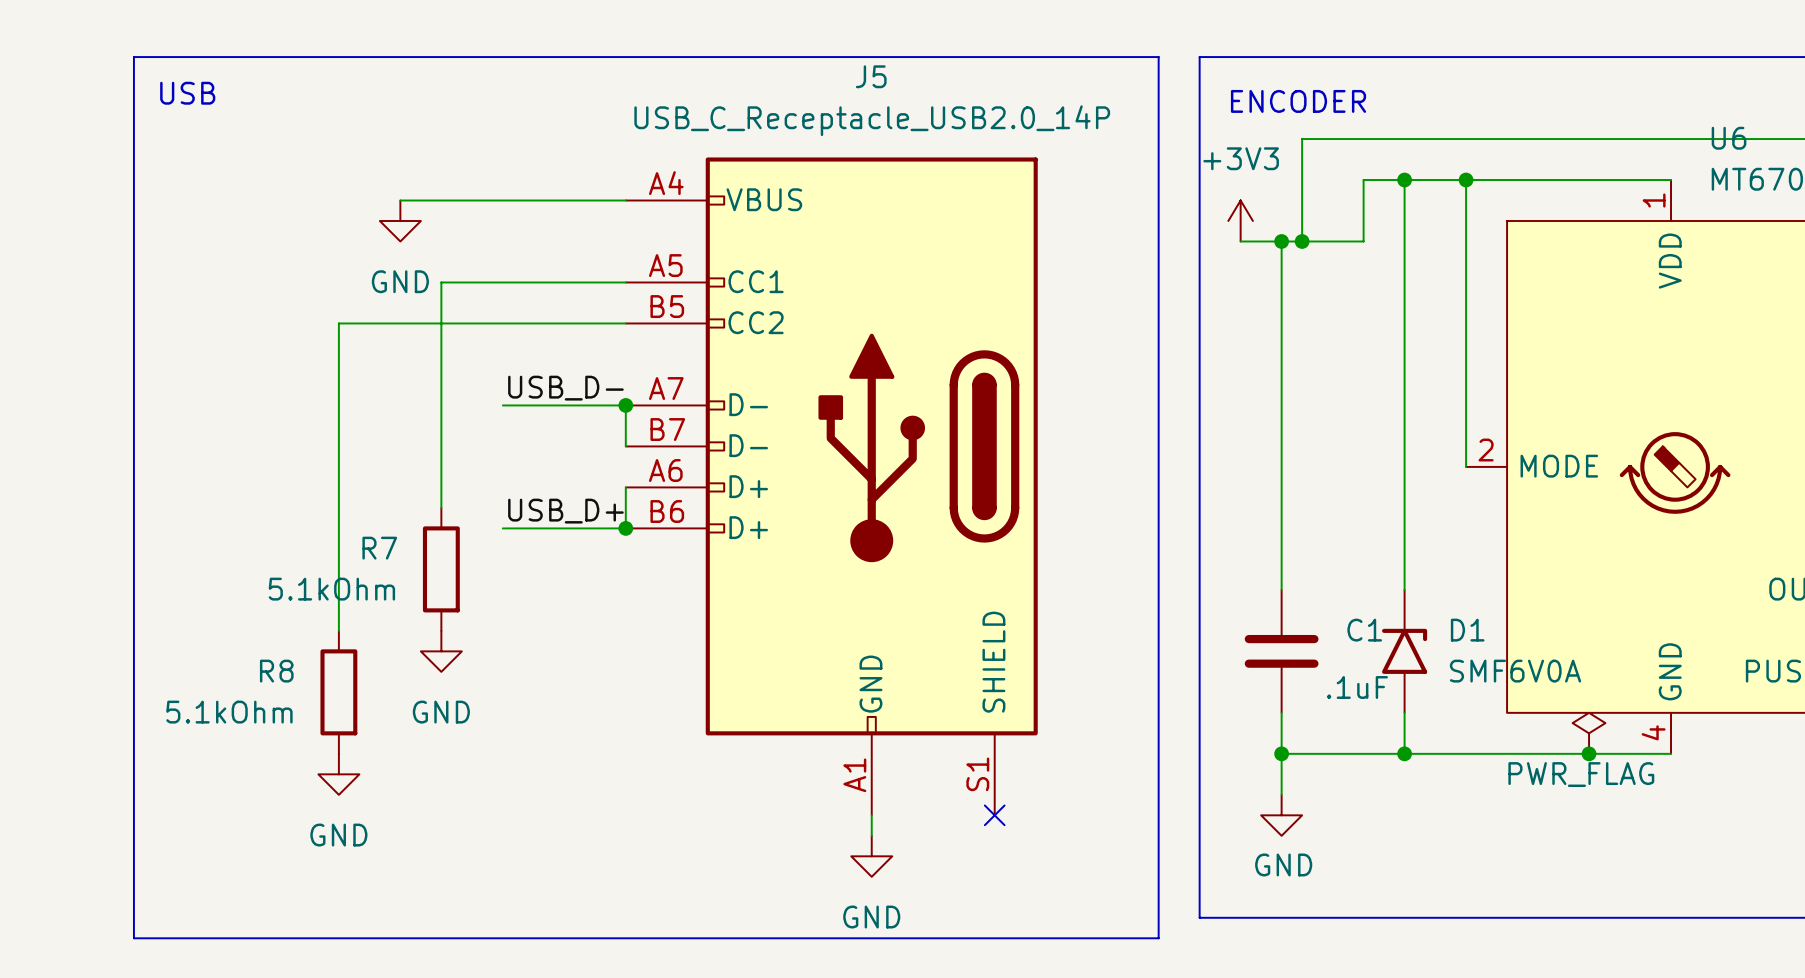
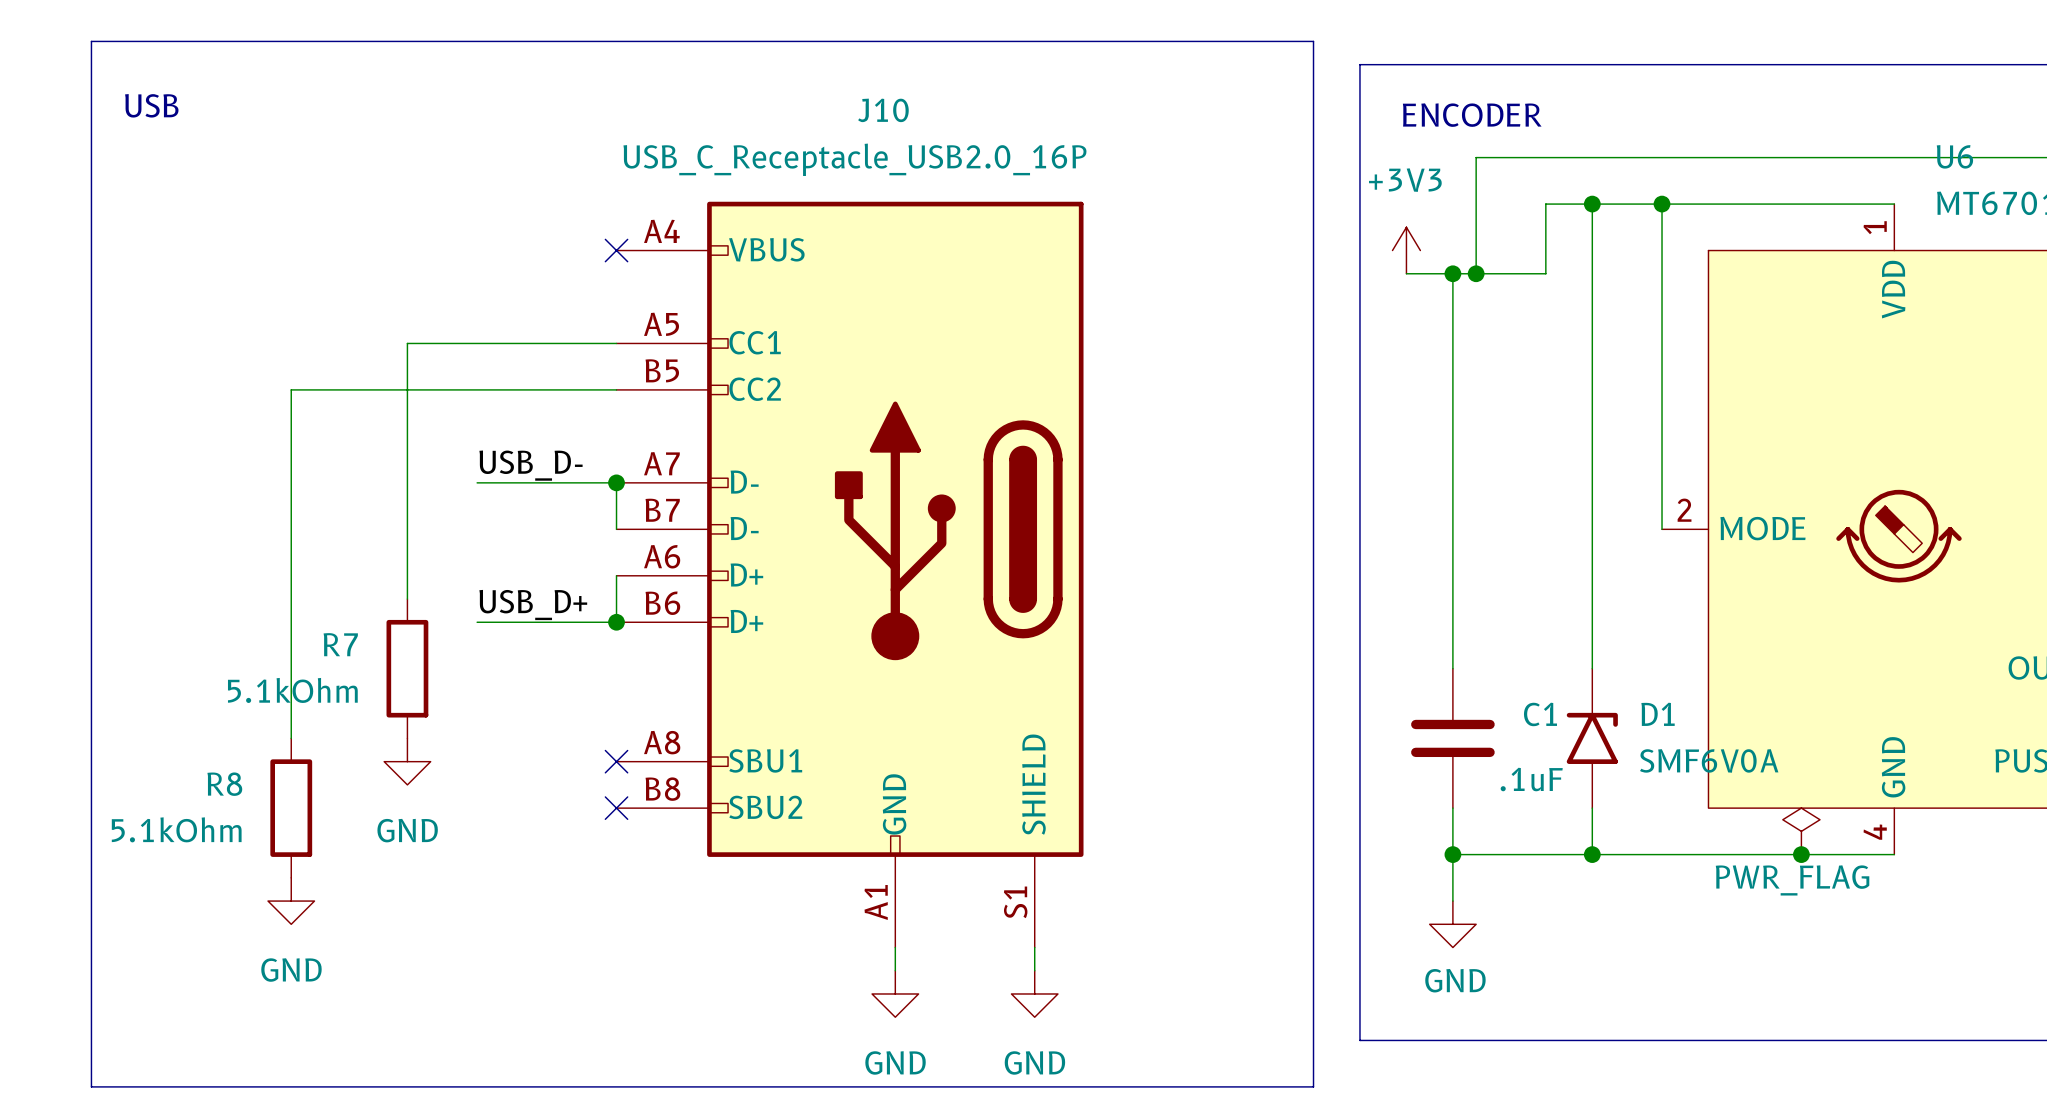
line: (1158, 57) (133, 57) (133, 938) (1158, 938) -> (1313, 64) (1313, 41) (91, 41) (91, 1086) (1313, 1086) (1313, 1063)
text position: USB (187, 93) -> USB (151, 105)
wire: (400, 200) (625, 200) -> none
power symbol: GND (400, 220) -> none
no-connect mark: none -> (616, 250)
wire: (625, 282) (441, 282) (441, 507) -> (616, 343) (407, 343) (407, 599)
wire: (625, 323) (338, 323) (338, 630) -> (616, 389) (291, 389) (291, 738)
label position: USB_D- (565, 388) -> USB_D- (531, 465)
wire: (502, 405) (625, 405) (625, 446) -> (477, 482) (616, 482) (616, 529)
junction: (625, 405) -> none
junction: none -> (616, 482)
J5: USB_C_Receptacle_USB2.0_14P (831, 486) -> none
wire: (625, 487) (625, 528) (502, 528) -> (616, 575) (616, 622) (477, 622)
J10: none -> USB_C_Receptacle_USB2.0_16P (850, 574)
label position: USB_D+ (565, 511) -> USB_D+ (533, 605)
junction: (625, 528) -> none
junction: none -> (616, 622)
R7 position: (441, 569) -> (407, 668)
power symbol: GND (441, 651) -> none
power symbol: none -> GND (407, 761)
no-connect mark: none -> (616, 761)
R8 position: (338, 692) -> (291, 808)
no-connect mark: none -> (616, 808)
power symbol: GND (338, 774) -> none
power symbol: none -> GND (291, 901)
wire: (871, 815) (871, 835) -> (895, 947) (895, 970)
no-connect mark: (994, 815) -> none
wire: none -> (1034, 947) (1034, 970)
power symbol: GND (871, 856) -> none
power symbol: none -> GND (895, 993)
power symbol: none -> GND (1034, 993)

